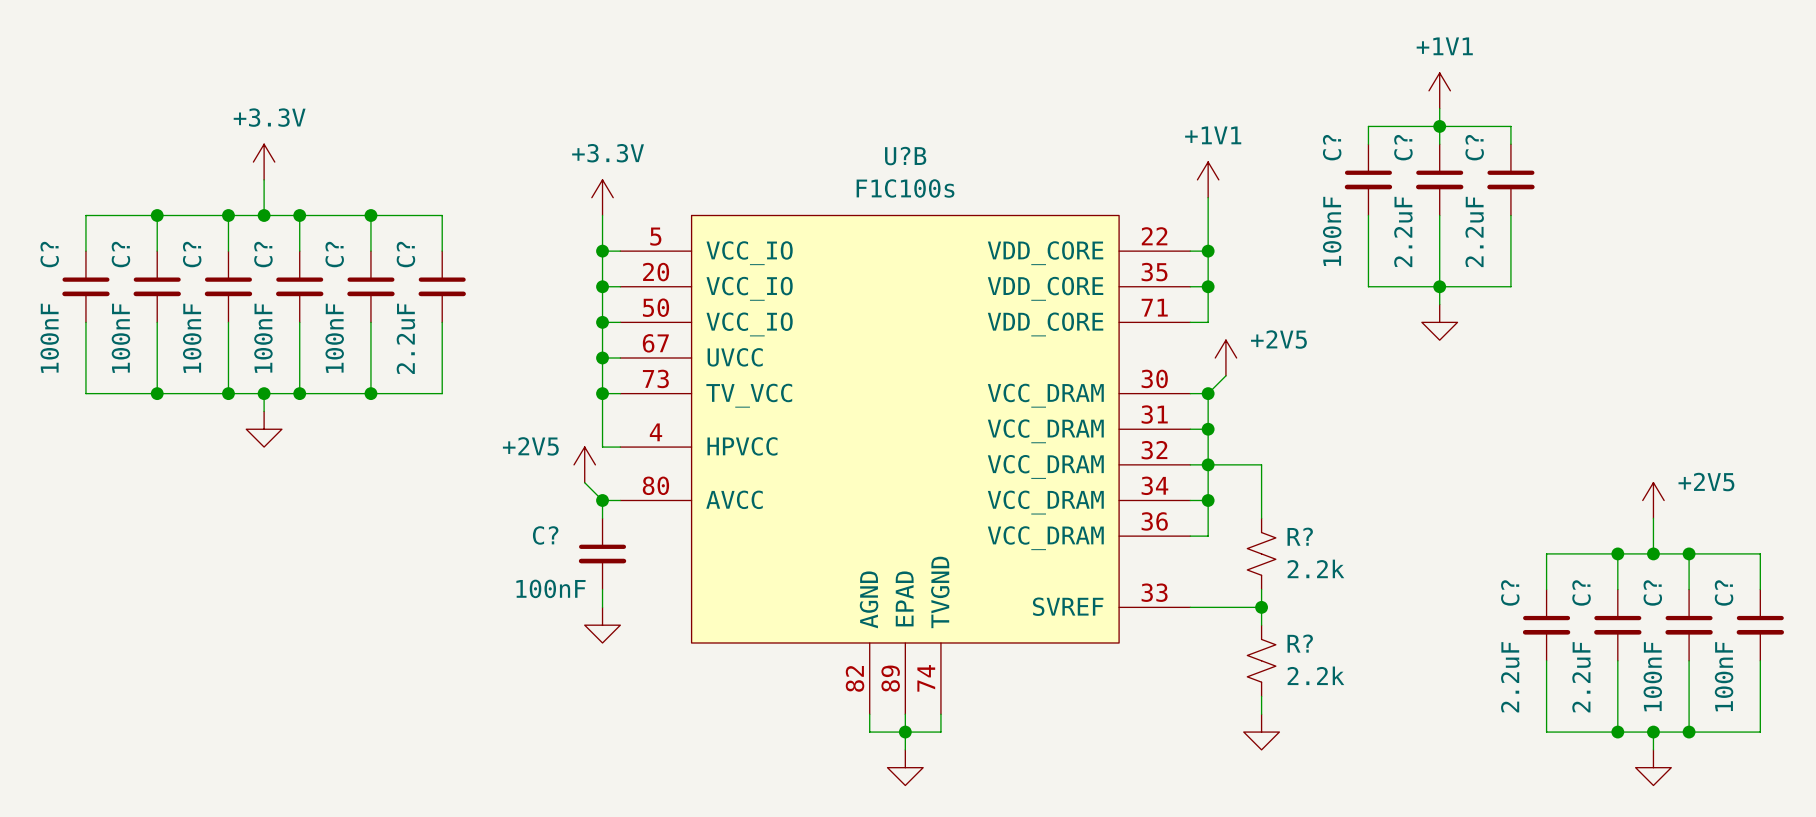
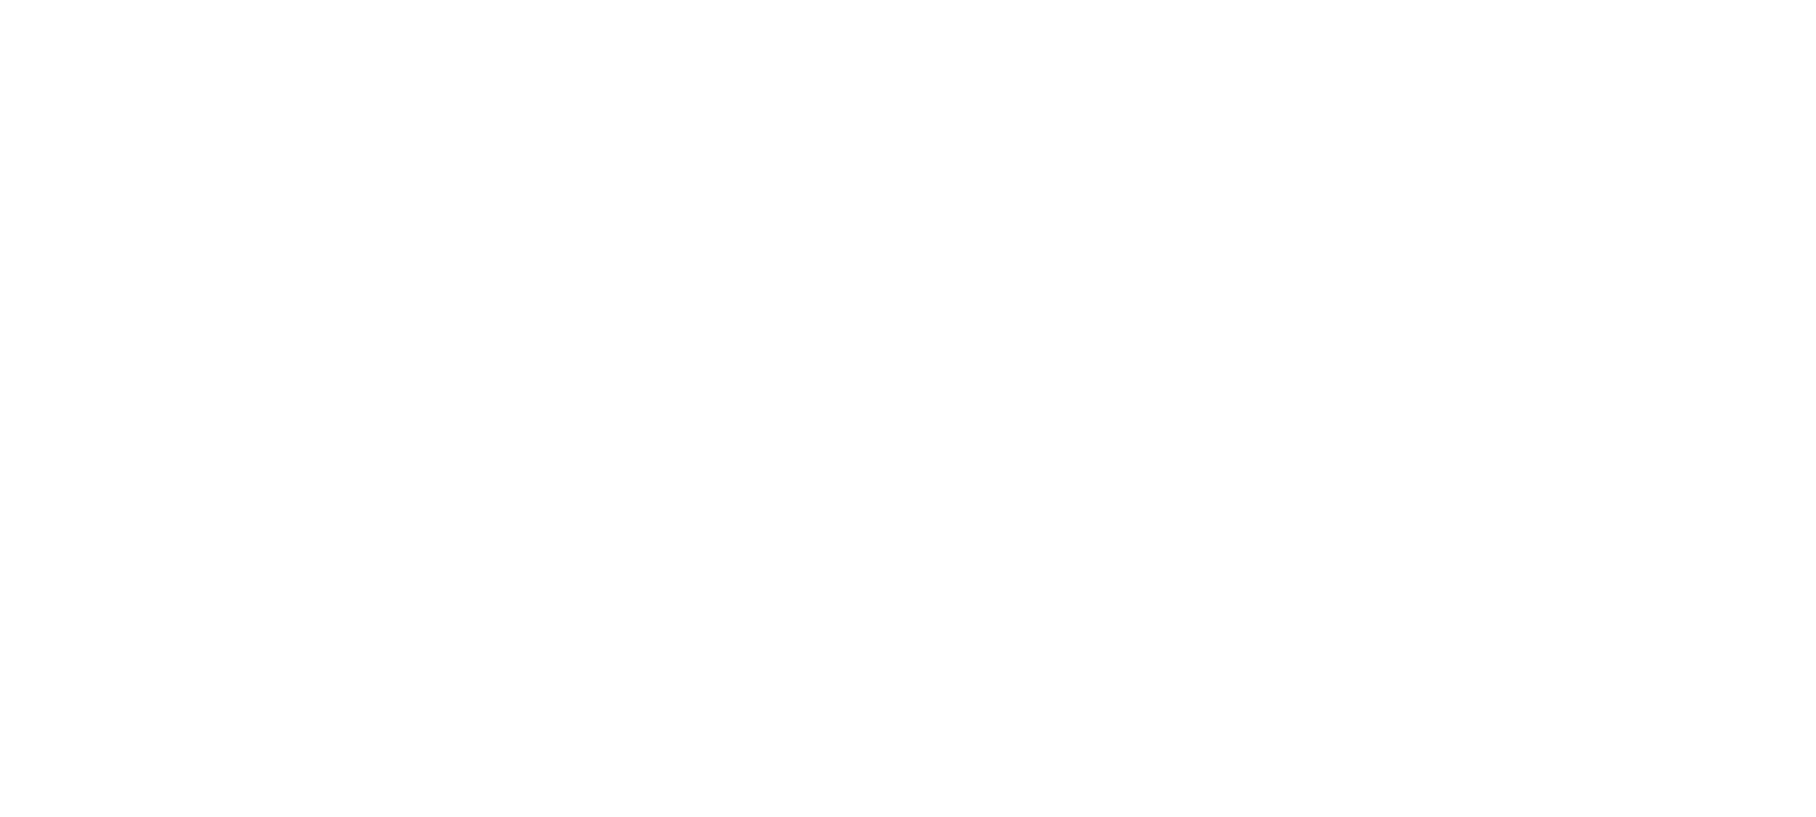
power symbol: +1V1 (1439, 90) -> none
wire: (1439, 108) (1439, 144) -> none
junction: (1439, 126) -> none
wire: (1368, 144) (1368, 126) (1510, 126) (1510, 144) -> none
power symbol: +3.3V (264, 162) -> none
wire: (264, 179) (264, 215) -> none
power symbol: +1V1 (1208, 179) -> none
C?: 100nF (1368, 179) -> none
C?: 2.2uF (1439, 179) -> none
C?: 2.2uF (1510, 179) -> none
power symbol: +3.3V (602, 197) -> none
wire: (1208, 197) (1208, 322) (1190, 322) -> none
wire: (157, 215) (157, 251) -> none
junction: (157, 215) -> none
wire: (228, 215) (228, 251) -> none
junction: (228, 215) -> none
junction: (264, 215) -> none
wire: (299, 215) (299, 251) -> none
junction: (299, 215) -> none
wire: (370, 215) (370, 251) -> none
junction: (370, 215) -> none
wire: (602, 215) (602, 447) (620, 447) -> none
wire: (1368, 215) (1368, 286) (1510, 286) (1510, 215) -> none
wire: (1439, 215) (1439, 304) -> none
wire: (85, 251) (85, 215) (442, 215) (442, 251) -> none
wire: (602, 251) (620, 251) -> none
junction: (602, 251) -> none
wire: (1190, 251) (1208, 251) -> none
junction: (1208, 251) -> none
C?: 100nF (85, 286) -> none
C?: 100nF (157, 286) -> none
C?: 100nF (228, 286) -> none
C?: 100nF (299, 286) -> none
C?: 100nF (370, 286) -> none
C?: 2.2uF (442, 286) -> none
wire: (602, 286) (620, 286) -> none
junction: (602, 286) -> none
wire: (1190, 286) (1208, 286) -> none
junction: (1208, 286) -> none
junction: (1439, 286) -> none
wire: (85, 322) (85, 393) (442, 393) (442, 322) -> none
wire: (157, 322) (157, 393) -> none
wire: (228, 322) (228, 393) -> none
wire: (299, 322) (299, 393) -> none
wire: (370, 322) (370, 393) -> none
wire: (602, 322) (620, 322) -> none
junction: (602, 322) -> none
power symbol: (1439, 322) -> none
wire: (602, 358) (620, 358) -> none
junction: (602, 358) -> none
power symbol: +2V5 (1225, 358) -> none
wire: (1225, 375) (1208, 393) -> none
junction: (157, 393) -> none
junction: (228, 393) -> none
wire: (264, 393) (264, 411) -> none
junction: (264, 393) -> none
junction: (299, 393) -> none
junction: (370, 393) -> none
wire: (602, 393) (620, 393) -> none
junction: (602, 393) -> none
wire: (1190, 393) (1208, 393) -> none
wire: (1208, 393) (1208, 536) (1190, 536) -> none
junction: (1208, 393) -> none
power symbol: (264, 429) -> none
wire: (1190, 429) (1208, 429) -> none
junction: (1208, 429) -> none
power symbol: +2V5 (584, 464) -> none
U?B: F1C100s (905, 464) -> none
wire: (1190, 464) (1261, 464) (1261, 518) -> none
junction: (1208, 464) -> none
wire: (584, 482) (602, 500) -> none
wire: (602, 500) (602, 518) -> none
wire: (602, 500) (620, 500) -> none
junction: (602, 500) -> none
wire: (1190, 500) (1208, 500) -> none
junction: (1208, 500) -> none
power symbol: +2V5 (1653, 500) -> none
wire: (1653, 518) (1653, 553) -> none
C?: 100nF (602, 553) -> none
R?: 2.2k (1261, 553) -> none
wire: (1617, 553) (1617, 589) -> none
junction: (1617, 553) -> none
junction: (1653, 553) -> none
wire: (1689, 553) (1689, 589) -> none
junction: (1689, 553) -> none
wire: (602, 589) (602, 607) -> none
wire: (1261, 589) (1261, 625) -> none
wire: (1546, 589) (1546, 553) (1760, 553) (1760, 589) -> none
wire: (1190, 607) (1261, 607) -> none
junction: (1261, 607) -> none
power symbol: (602, 625) -> none
C?: 2.2uF (1546, 625) -> none
C?: 2.2uF (1617, 625) -> none
C?: 100nF (1689, 625) -> none
C?: 100nF (1760, 625) -> none
R?: 2.2k (1261, 660) -> none
wire: (1546, 660) (1546, 732) (1760, 732) (1760, 660) -> none
wire: (1617, 660) (1617, 732) -> none
wire: (1689, 660) (1689, 732) -> none
wire: (1261, 696) (1261, 714) -> none
wire: (869, 714) (869, 732) (940, 732) (940, 714) -> none
wire: (905, 714) (905, 749) -> none
junction: (905, 732) -> none
power symbol: (1261, 732) -> none
junction: (1617, 732) -> none
wire: (1653, 732) (1653, 749) -> none
junction: (1653, 732) -> none
junction: (1689, 732) -> none
power symbol: (905, 767) -> none
power symbol: (1653, 767) -> none

